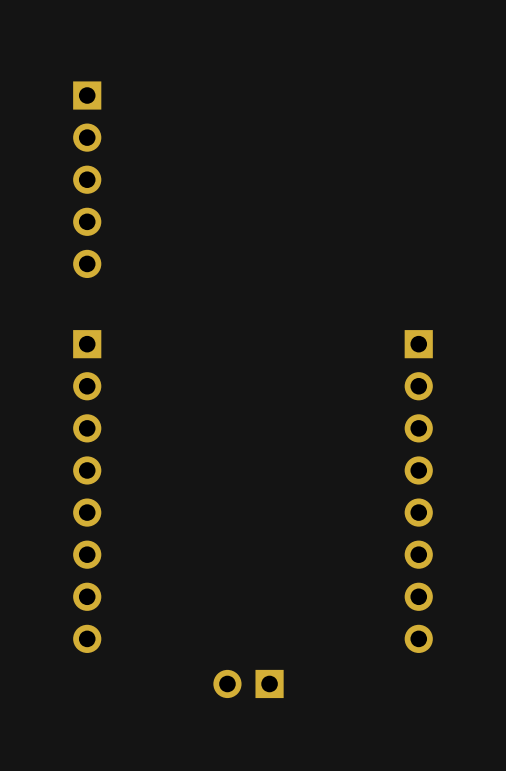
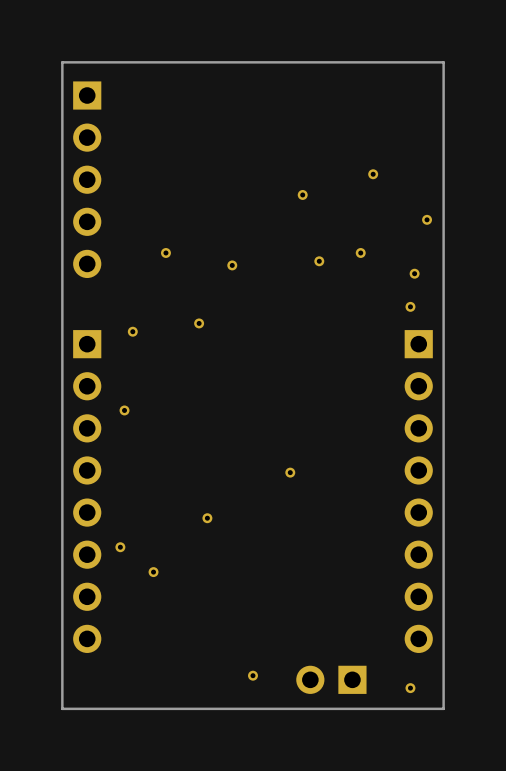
board edge: none -> (443, 62) (443, 708) (62, 708) (62, 62) (443, 62)
part: none -> (373, 174)
part: none -> (302, 194)
part: none -> (427, 219)
part: none -> (165, 252)
part: none -> (360, 252)
part: none -> (319, 261)
part: none -> (232, 265)
part: none -> (414, 273)
part: none -> (410, 306)
part: none -> (199, 323)
part: none -> (132, 331)
part: none -> (124, 410)
part: none -> (290, 472)
part: none -> (207, 518)
part: none -> (120, 547)
part: none -> (153, 572)
part footprint: [213, 669, 284, 699] -> [248, 670, 258, 681]
part: none -> (331, 679)
part: none -> (410, 688)

